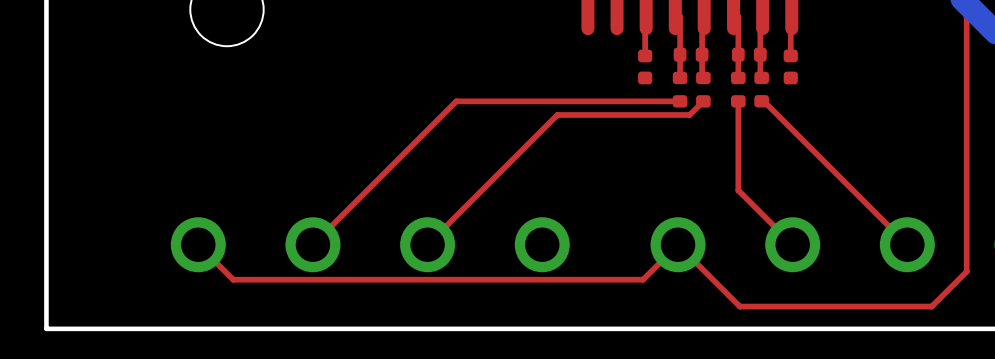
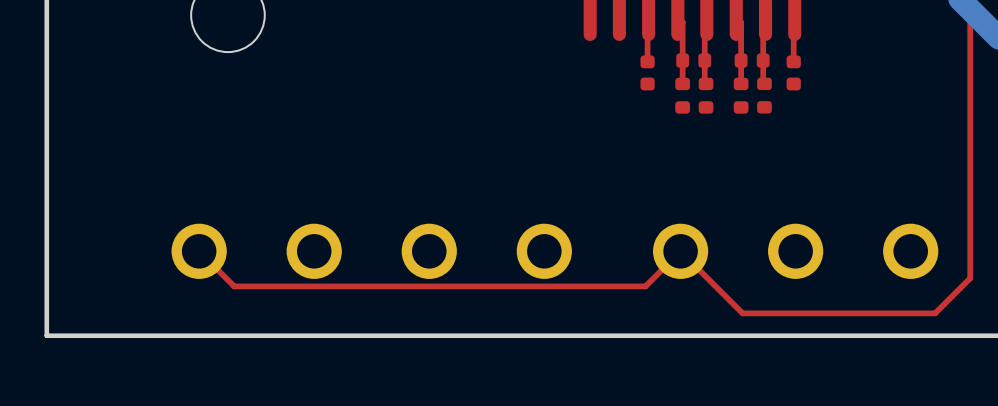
top track: (680, 101) (456, 101) (312, 244) -> none
top track: (703, 101) (689, 115) (557, 115) (427, 244) -> none
top track: (738, 101) (738, 190) (792, 244) -> none
top track: (761, 101) (763, 101) (907, 244) -> none

